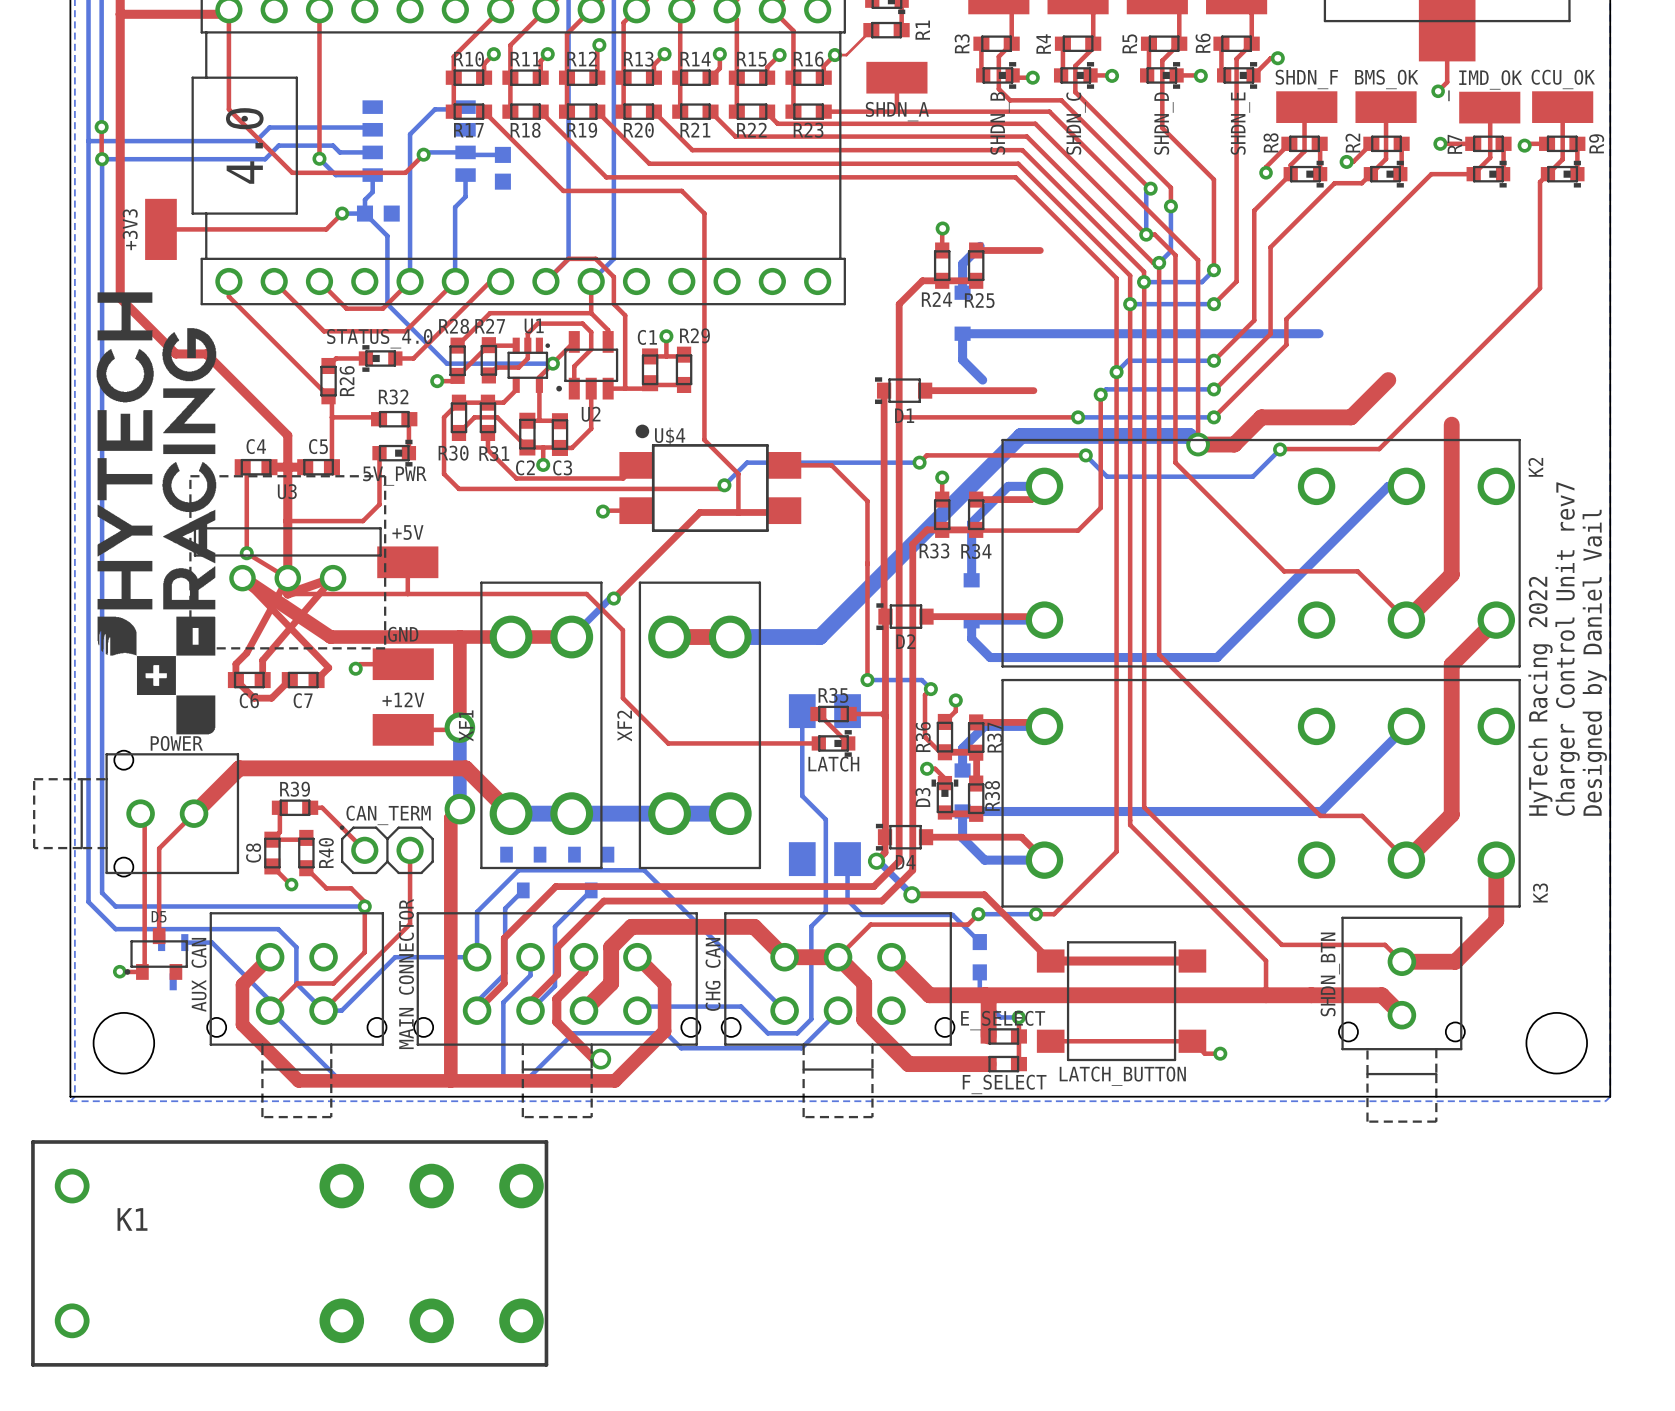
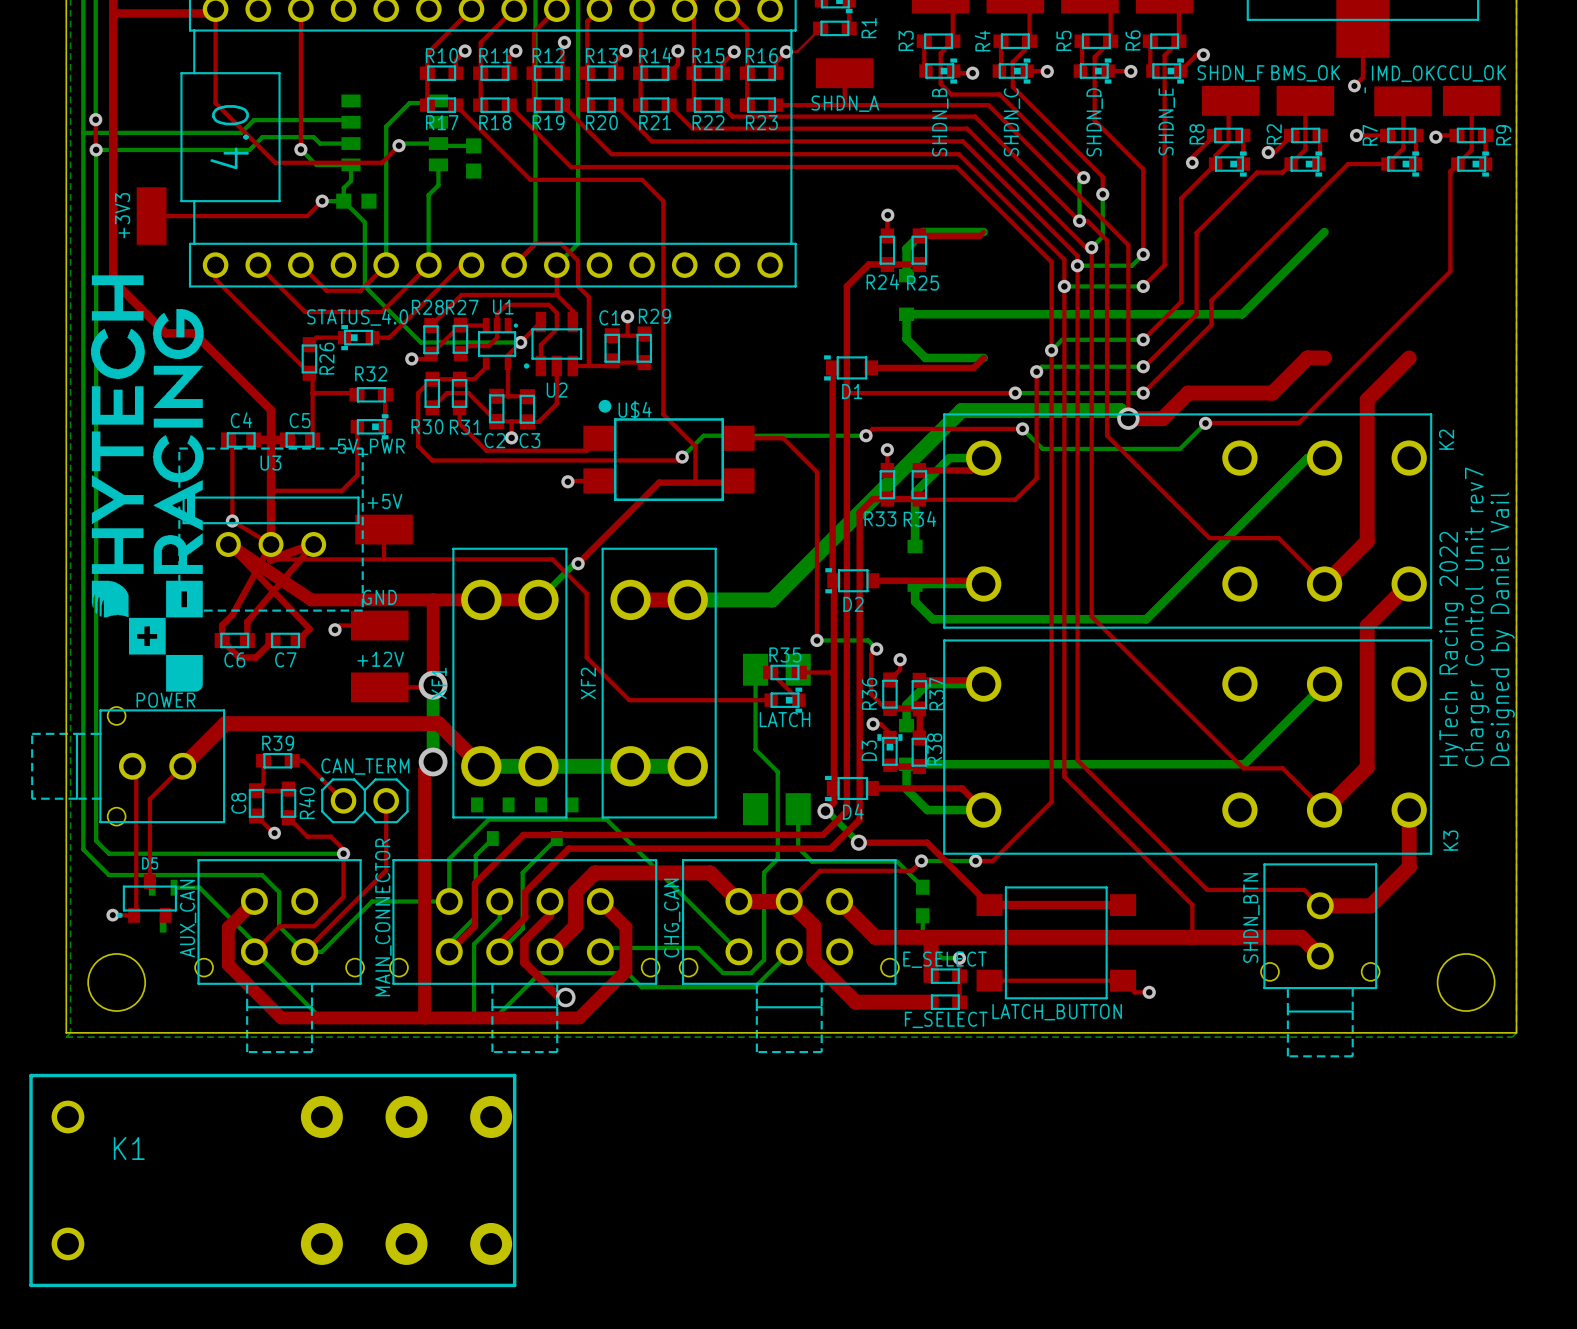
bottom track: none -> (923, 232) (983, 232)
top track: none -> (983, 232) (979, 235)
bottom track: none -> (1324, 232) (1242, 314)
bottom track: none -> (925, 357) (983, 357)
top track: none -> (983, 357) (973, 367)
top track: none -> (1307, 357) (1324, 357)
top track: none -> (1409, 357) (1367, 399)

